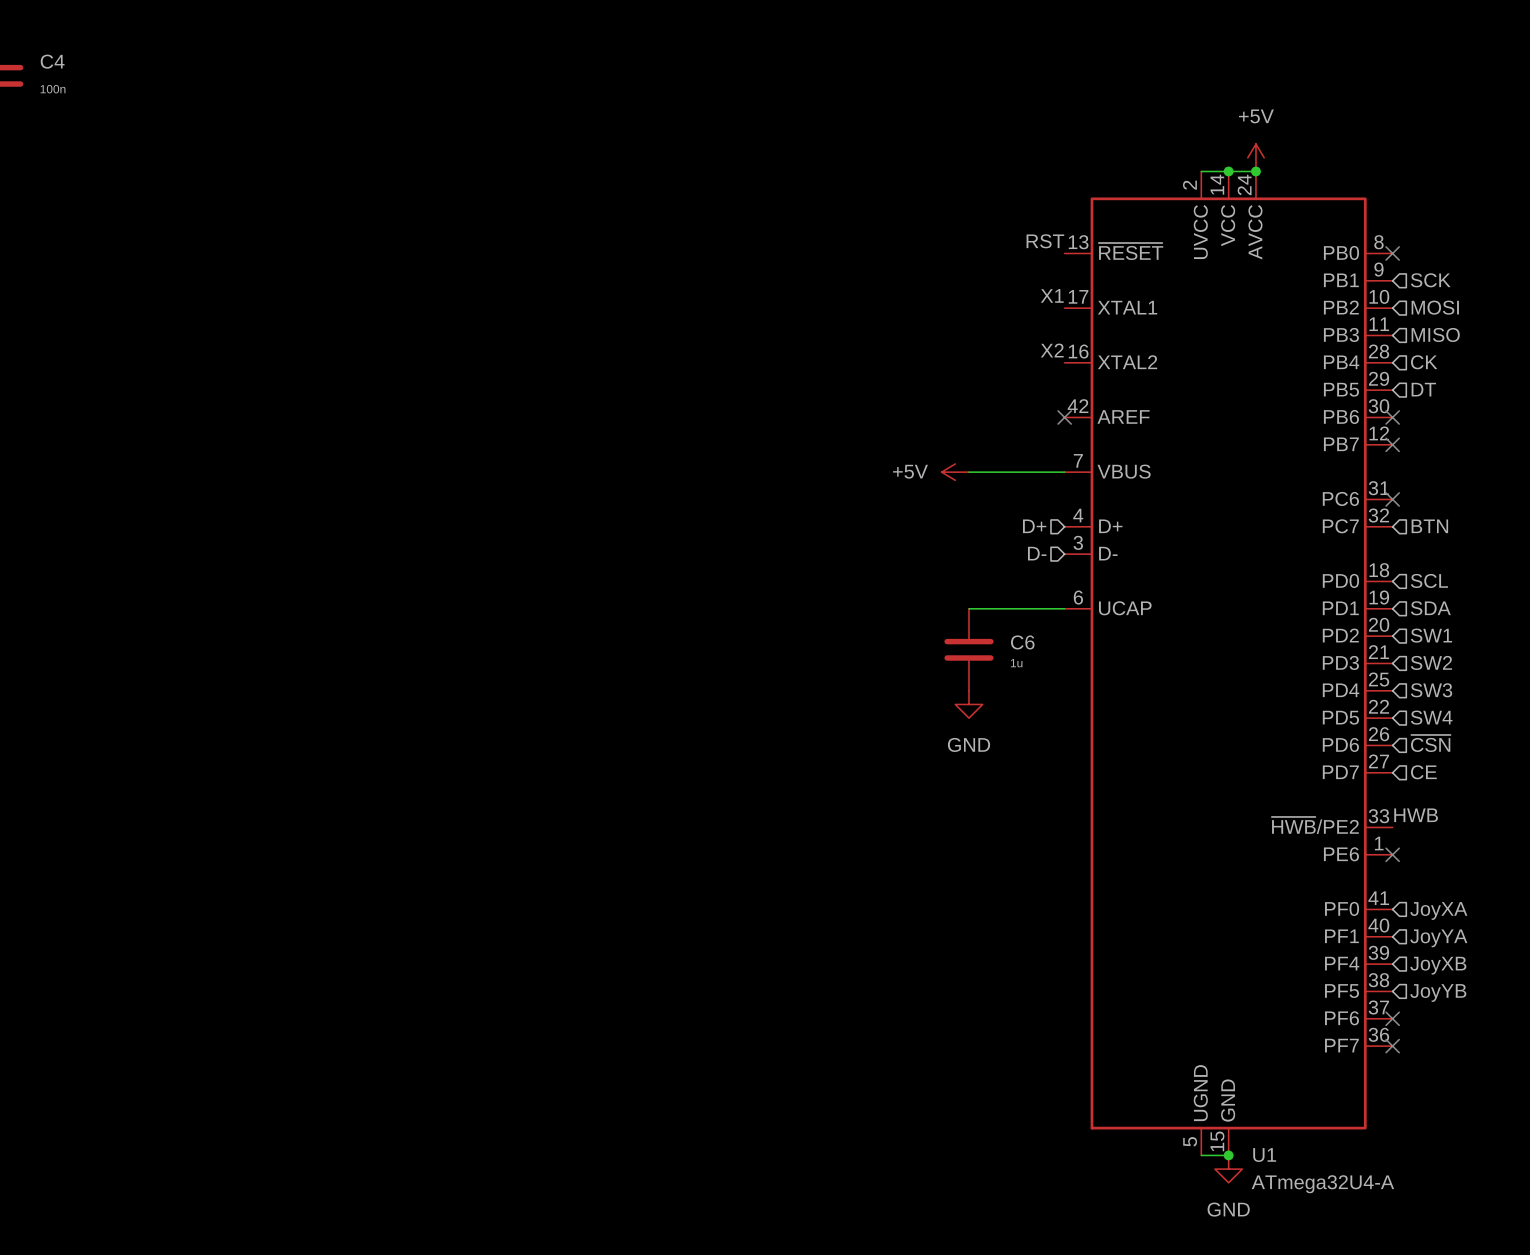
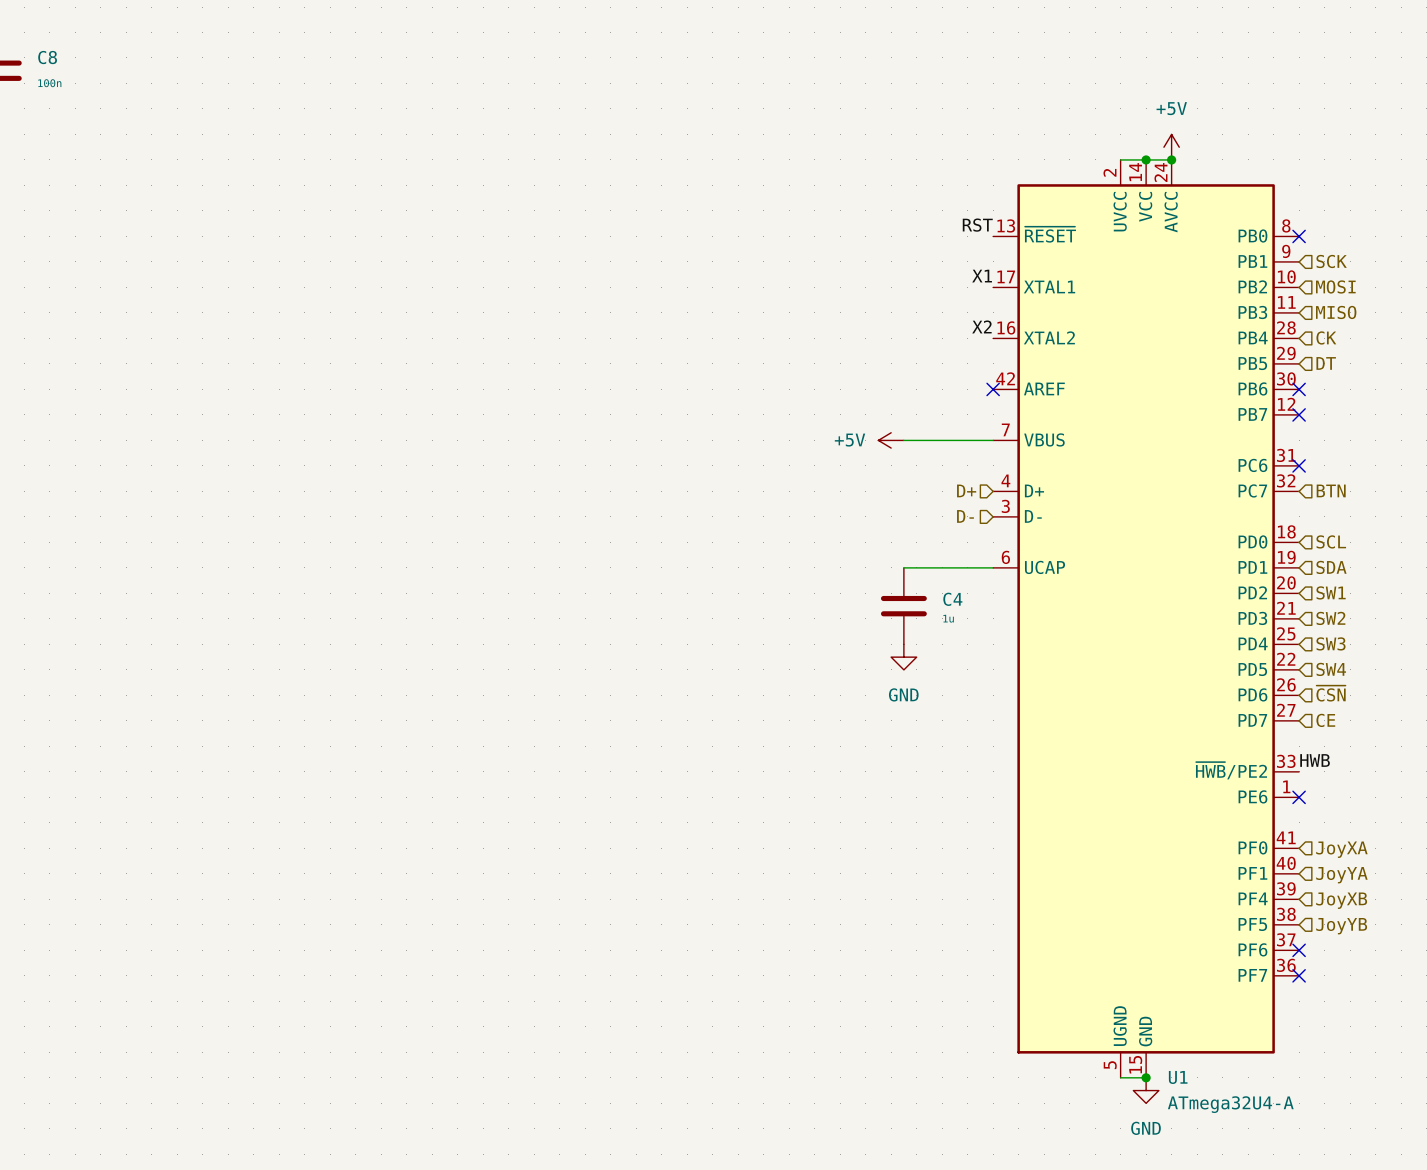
C4 name: C4 (52, 61) -> C8 (47, 57)
C6 name: C6 (1022, 642) -> C4 (952, 599)

